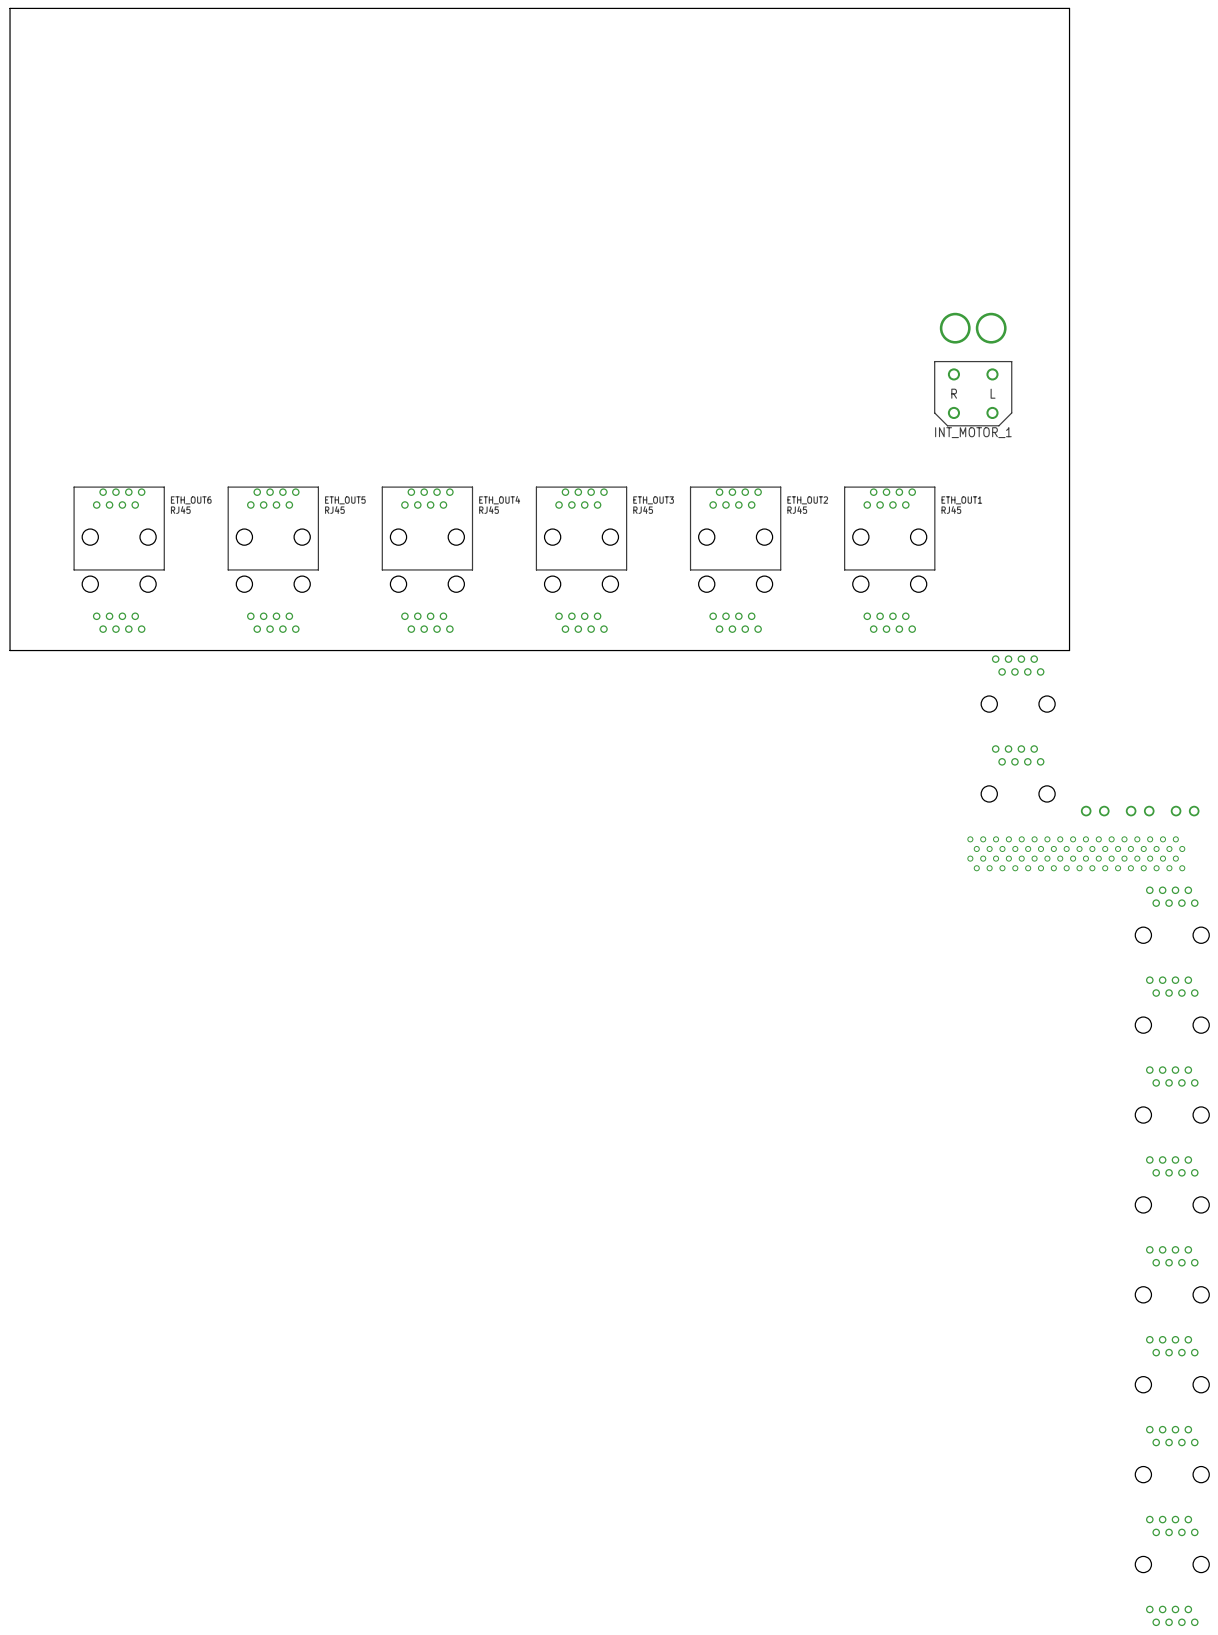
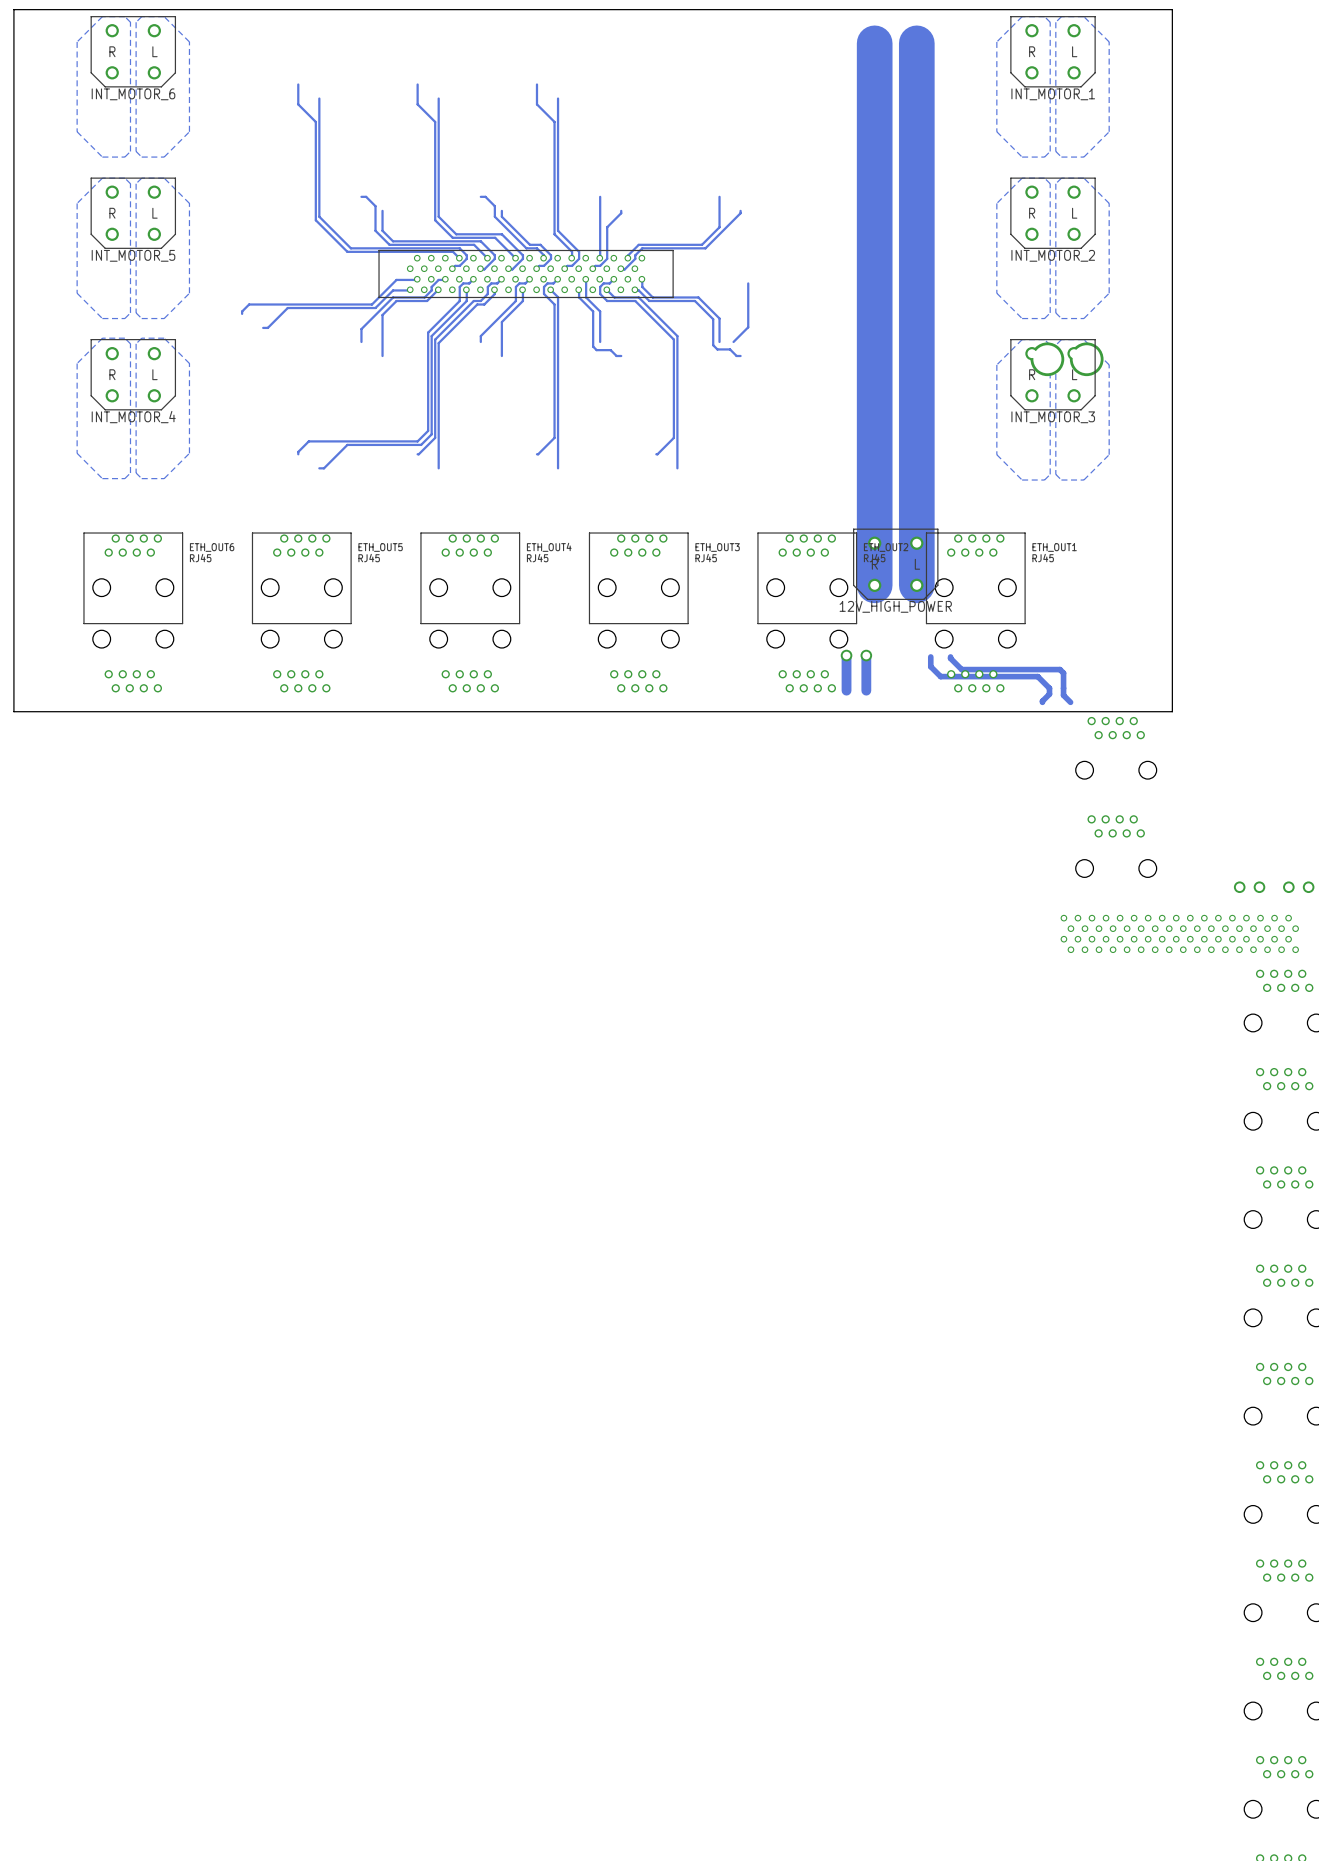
zone outline: none -> (124, 16) (102, 16) (77, 41) (77, 131) (102, 157) (124, 157) (130, 151) (130, 22) (124, 16)
zone outline: none -> (164, 16) (141, 16) (136, 22) (136, 151) (141, 157) (164, 157) (189, 131) (189, 41) (164, 16)
zone outline: none -> (1044, 16) (1022, 16) (996, 41) (996, 131) (1022, 157) (1044, 157) (1050, 151) (1050, 22) (1044, 16)
zone outline: none -> (1083, 16) (1109, 41) (1109, 131) (1083, 157) (1061, 157) (1055, 151) (1055, 22) (1061, 16) (1083, 16)
track: none -> (874, 43) (874, 585)
track: none -> (916, 43) (916, 585)
INT_MOTOR_6: none -> (133, 51)
track: none -> (298, 84) (298, 104) (315, 121) (315, 220) (347, 251) (453, 251) (459, 258)
track: none -> (417, 84) (417, 104) (435, 121) (435, 220) (452, 237) (495, 237) (515, 258)
track: none -> (536, 84) (536, 104) (554, 121) (554, 234) (572, 251) (571, 258)
track: none -> (319, 98) (319, 216) (350, 248) (459, 248) (466, 255) (466, 258) (459, 265) (455, 265) (452, 268)
track: none -> (438, 98) (438, 216) (456, 234) (501, 234) (522, 255) (522, 258) (512, 269) (508, 268)
track: none -> (558, 98) (558, 230) (579, 251) (579, 258) (572, 265) (567, 265) (564, 268)
zone outline: none -> (124, 178) (102, 178) (77, 203) (77, 293) (102, 318) (124, 318) (130, 312) (130, 183) (124, 178)
zone outline: none -> (164, 178) (141, 178) (136, 183) (136, 312) (141, 318) (164, 318) (189, 293) (189, 203) (164, 178)
zone outline: none -> (1044, 178) (1022, 178) (996, 203) (996, 293) (1022, 318) (1044, 318) (1050, 312) (1050, 183) (1044, 178)
zone outline: none -> (1083, 178) (1109, 203) (1109, 293) (1083, 318) (1061, 318) (1055, 312) (1055, 183) (1061, 178) (1083, 178)
track: none -> (361, 196) (366, 196) (375, 206) (375, 230) (389, 244) (474, 244) (487, 258)
track: none -> (480, 196) (485, 196) (494, 206) (494, 216) (526, 248) (536, 248) (544, 255) (543, 258)
track: none -> (600, 196) (599, 258)
track: none -> (719, 196) (719, 227) (701, 244) (638, 244) (627, 258)
track: none -> (382, 210) (382, 230) (393, 241) (480, 241) (494, 255) (494, 258) (484, 269) (480, 268)
track: none -> (501, 210) (501, 216) (529, 244) (540, 244) (551, 255) (551, 258) (544, 265) (539, 265) (536, 268)
track: none -> (621, 210) (621, 213) (607, 227) (607, 258) (600, 265) (595, 265) (592, 268)
track: none -> (740, 210) (740, 213) (705, 248) (642, 248) (624, 269) (620, 268)
INT_MOTOR_5: none -> (133, 213)
INT_MOTOR_2: none -> (1053, 213)
part: none -> (526, 273)
track: none -> (417, 279) (396, 279) (372, 304) (249, 304) (242, 313)
track: none -> (445, 279) (438, 279) (424, 297) (393, 297) (361, 329) (361, 341)
track: none -> (473, 279) (469, 283) (463, 283) (459, 286) (459, 300) (428, 332) (428, 430) (417, 441) (308, 441) (298, 454)
track: none -> (501, 279) (497, 283) (491, 283) (487, 286) (487, 293) (480, 300) (473, 300) (435, 339) (435, 437) (417, 454)
track: none -> (529, 279) (525, 283) (519, 283) (515, 286) (515, 300) (480, 336) (480, 341)
track: none -> (557, 279) (553, 283) (547, 283) (544, 286) (544, 293) (554, 304) (554, 437) (536, 454)
track: none -> (585, 279) (586, 297) (600, 311) (600, 341)
track: none -> (613, 279) (609, 283) (603, 283) (600, 286) (600, 293) (607, 300) (635, 300) (673, 339) (673, 437) (656, 454)
track: none -> (641, 279) (642, 286) (652, 297) (698, 297) (719, 318) (719, 341)
track: none -> (748, 283) (748, 327) (733, 341)
track: none -> (410, 289) (393, 290) (375, 308) (287, 308) (267, 327) (263, 327)
track: none -> (438, 289) (427, 300) (396, 300) (382, 315) (382, 356)
track: none -> (466, 289) (466, 300) (431, 336) (431, 434) (421, 444) (347, 444) (324, 468) (319, 468)
track: none -> (494, 289) (494, 293) (484, 304) (477, 304) (438, 343) (438, 468)
track: none -> (522, 289) (522, 300) (501, 322) (501, 356)
track: none -> (550, 289) (558, 297) (558, 468)
track: none -> (578, 289) (579, 297) (593, 311) (593, 346) (596, 350) (610, 350) (616, 356) (621, 356)
track: none -> (606, 289) (614, 297) (638, 297) (677, 336) (677, 468)
track: none -> (634, 289) (638, 290) (649, 300) (694, 300) (713, 319) (713, 345) (717, 349) (730, 349) (736, 356) (740, 356)
zone outline: none -> (124, 338) (102, 338) (77, 363) (77, 453) (102, 478) (124, 478) (130, 473) (130, 343) (124, 338)
zone outline: none -> (164, 338) (189, 363) (189, 453) (164, 478) (141, 478) (136, 473) (136, 343) (141, 338) (164, 338)
zone outline: none -> (1044, 339) (1022, 339) (996, 364) (996, 454) (1022, 480) (1044, 480) (1050, 474) (1050, 345) (1044, 339)
zone outline: none -> (1083, 339) (1109, 364) (1109, 454) (1083, 480) (1061, 480) (1055, 474) (1055, 345) (1061, 339) (1083, 339)
INT_MOTOR_4: none -> (133, 374)
INT_MOTOR_3: none -> (1053, 374)
INT_MOTOR_1 position: (973, 393) -> (1053, 51)
12V_HIGH_POWER: none -> (895, 564)
track: none -> (846, 655) (846, 690)
part: none -> (856, 655)
track: none -> (866, 655) (866, 690)
track: none -> (930, 656) (930, 666) (940, 676) (1037, 676) (1049, 688) (1049, 694) (1042, 702)
track: none -> (950, 656) (961, 669) (1060, 669) (1063, 673) (1063, 695) (1070, 702)
part: (1095, 811) -> none

